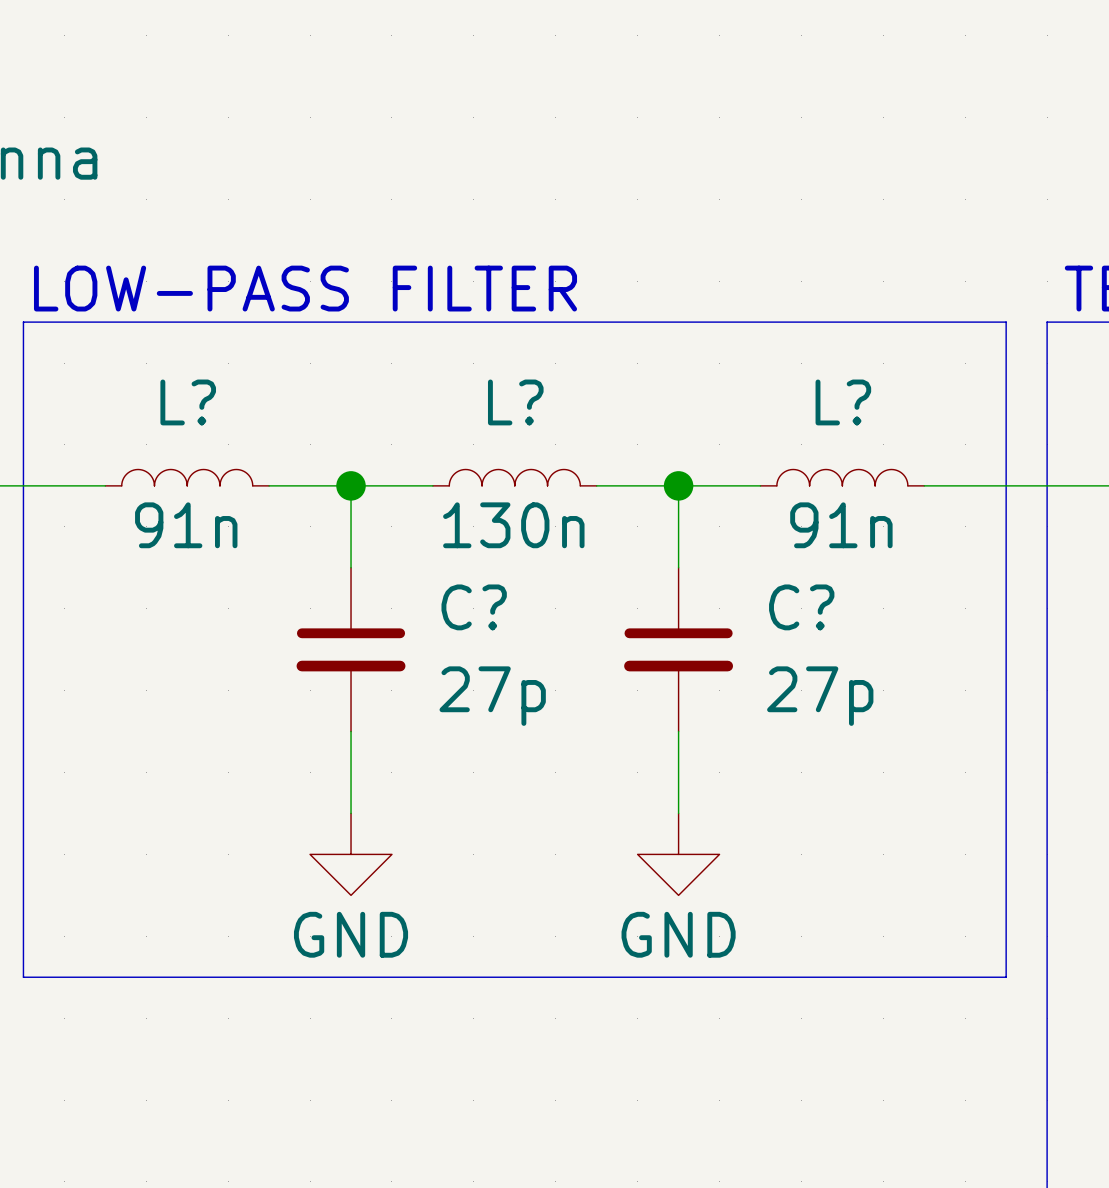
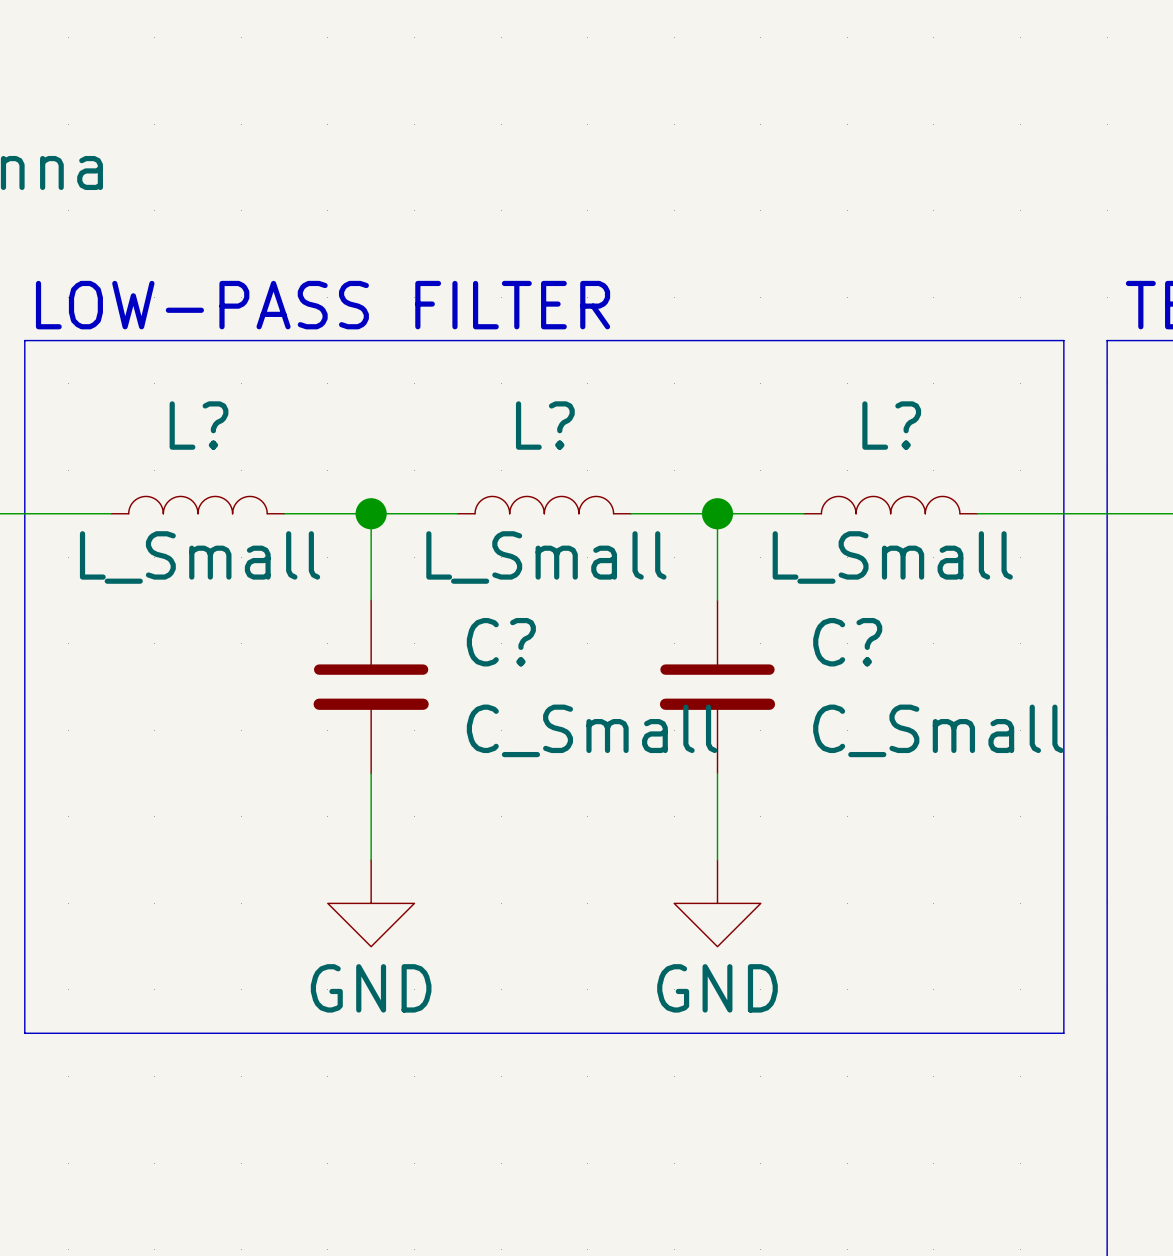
L? value: 91n (186, 525) -> L_Small (200, 557)
L? value: 130n (513, 525) -> L_Small (546, 557)
L? value: 91n (841, 525) -> L_Small (892, 557)
C? value: 27p (492, 696) -> C_Small (592, 730)
C? value: 27p (820, 696) -> C_Small (938, 730)

